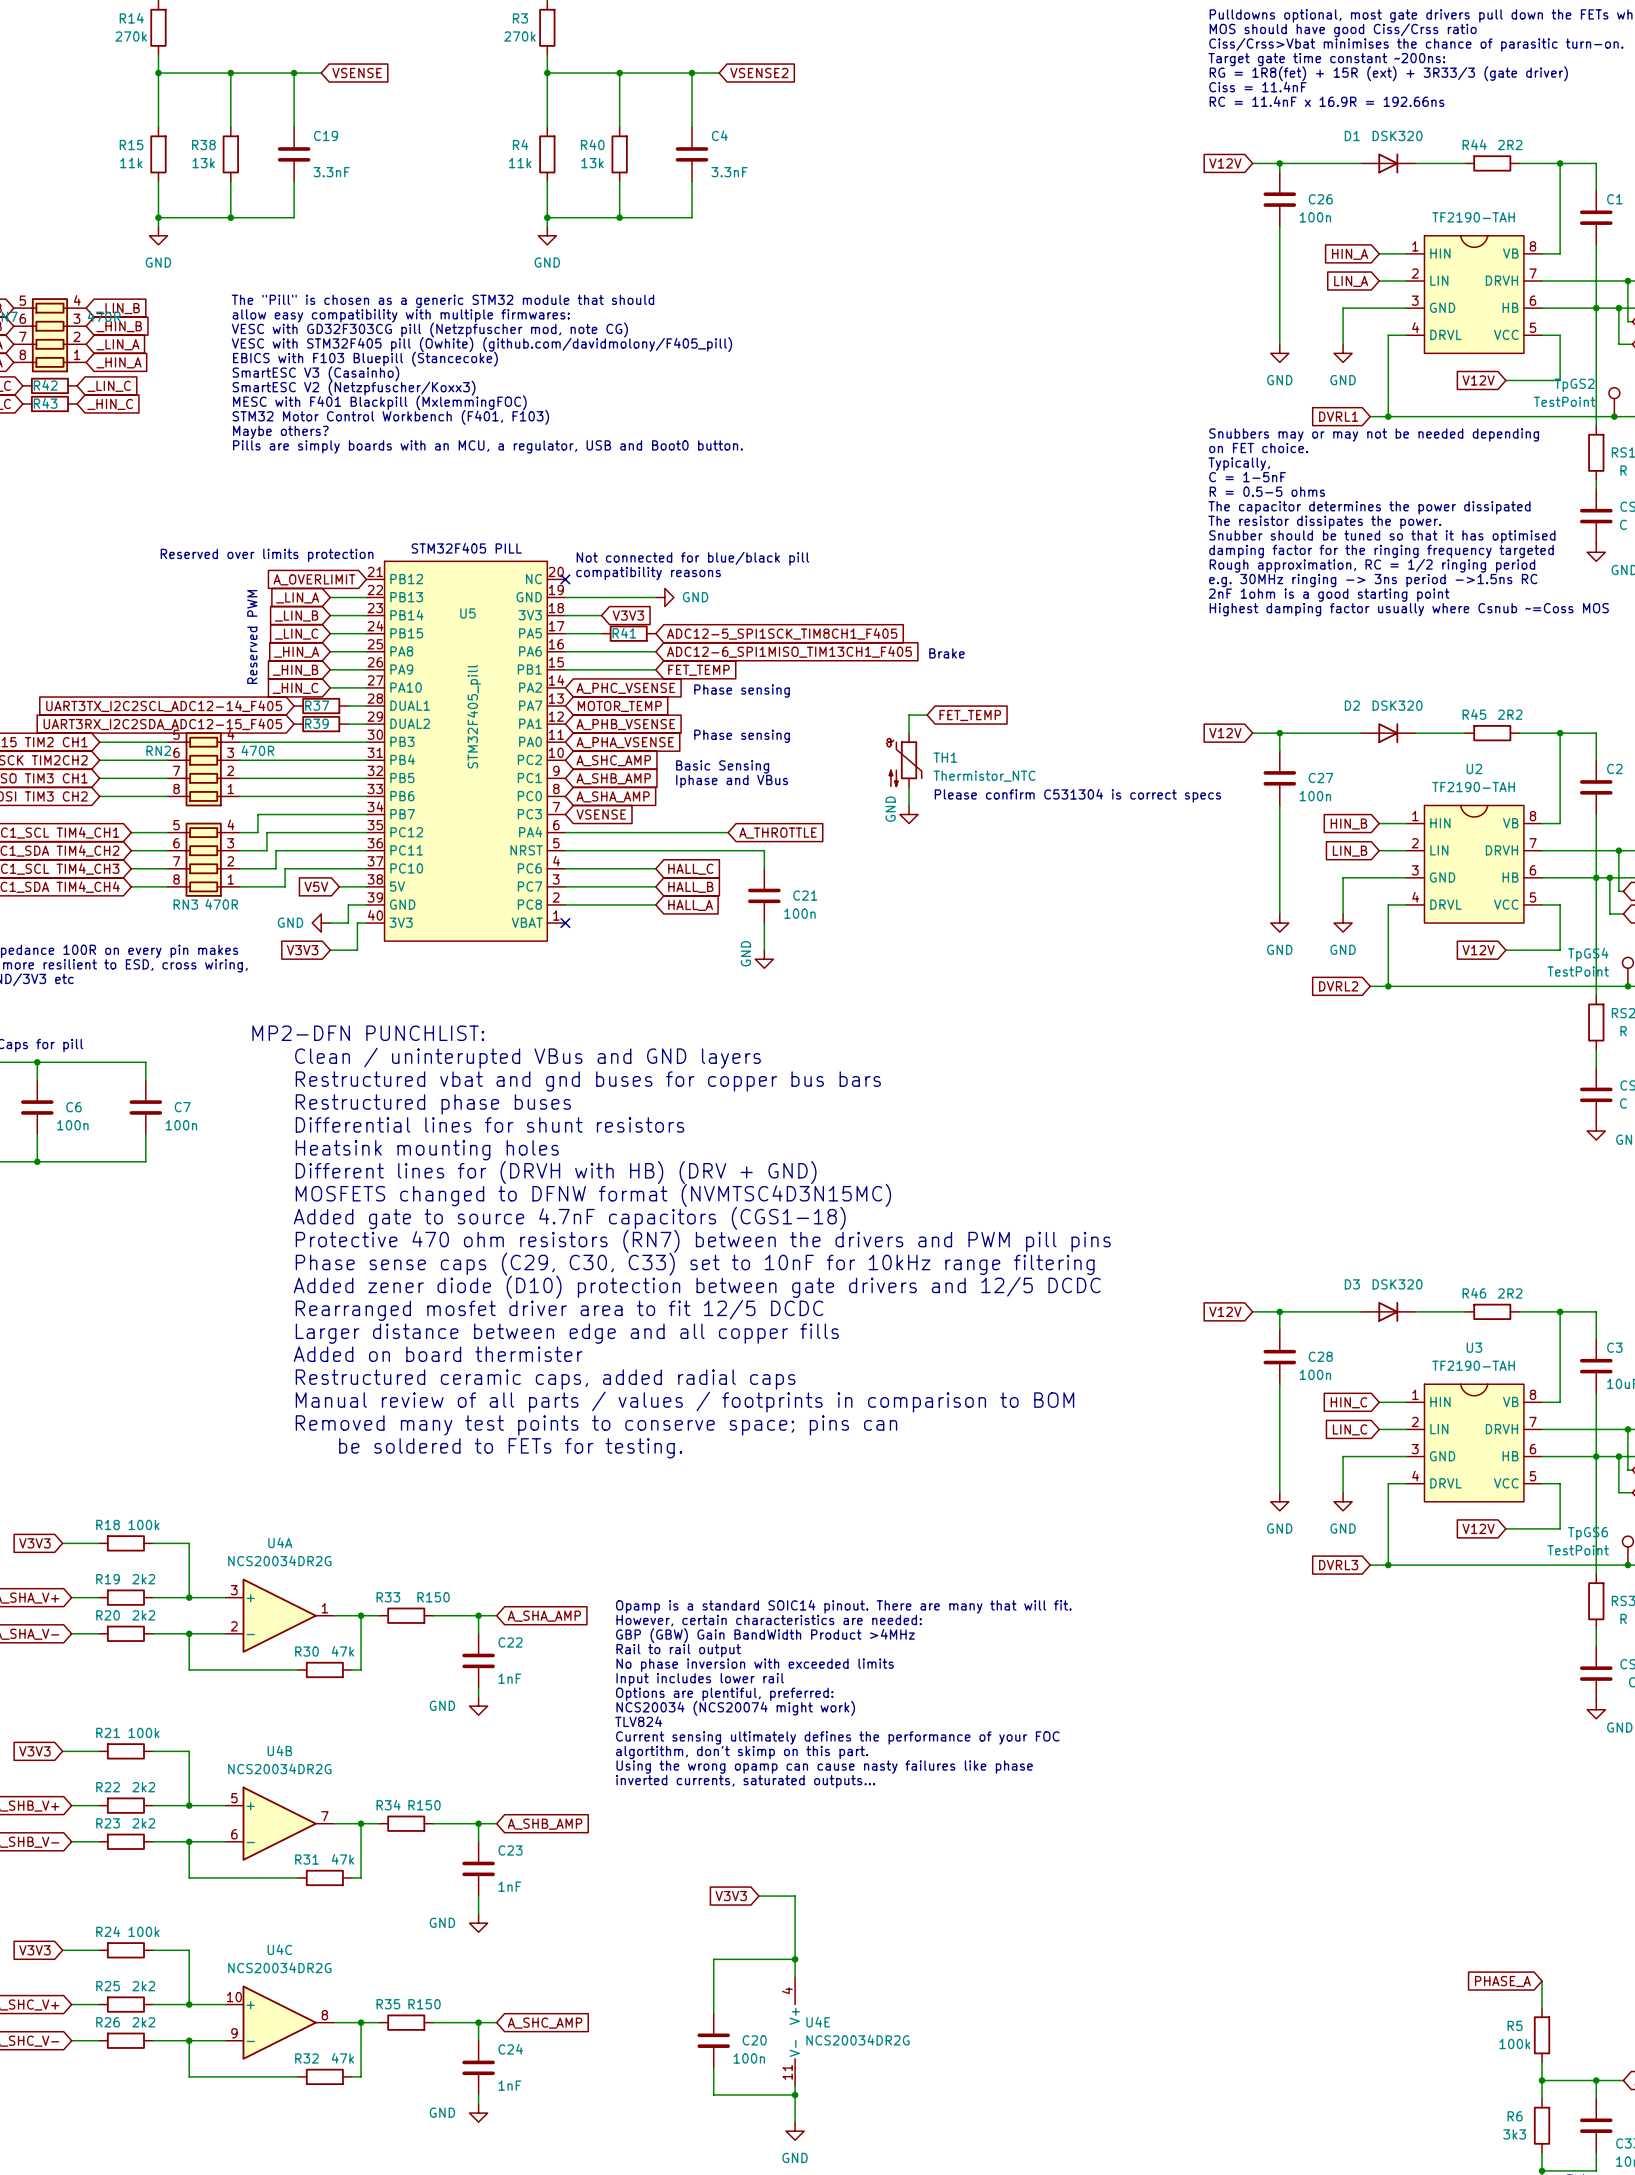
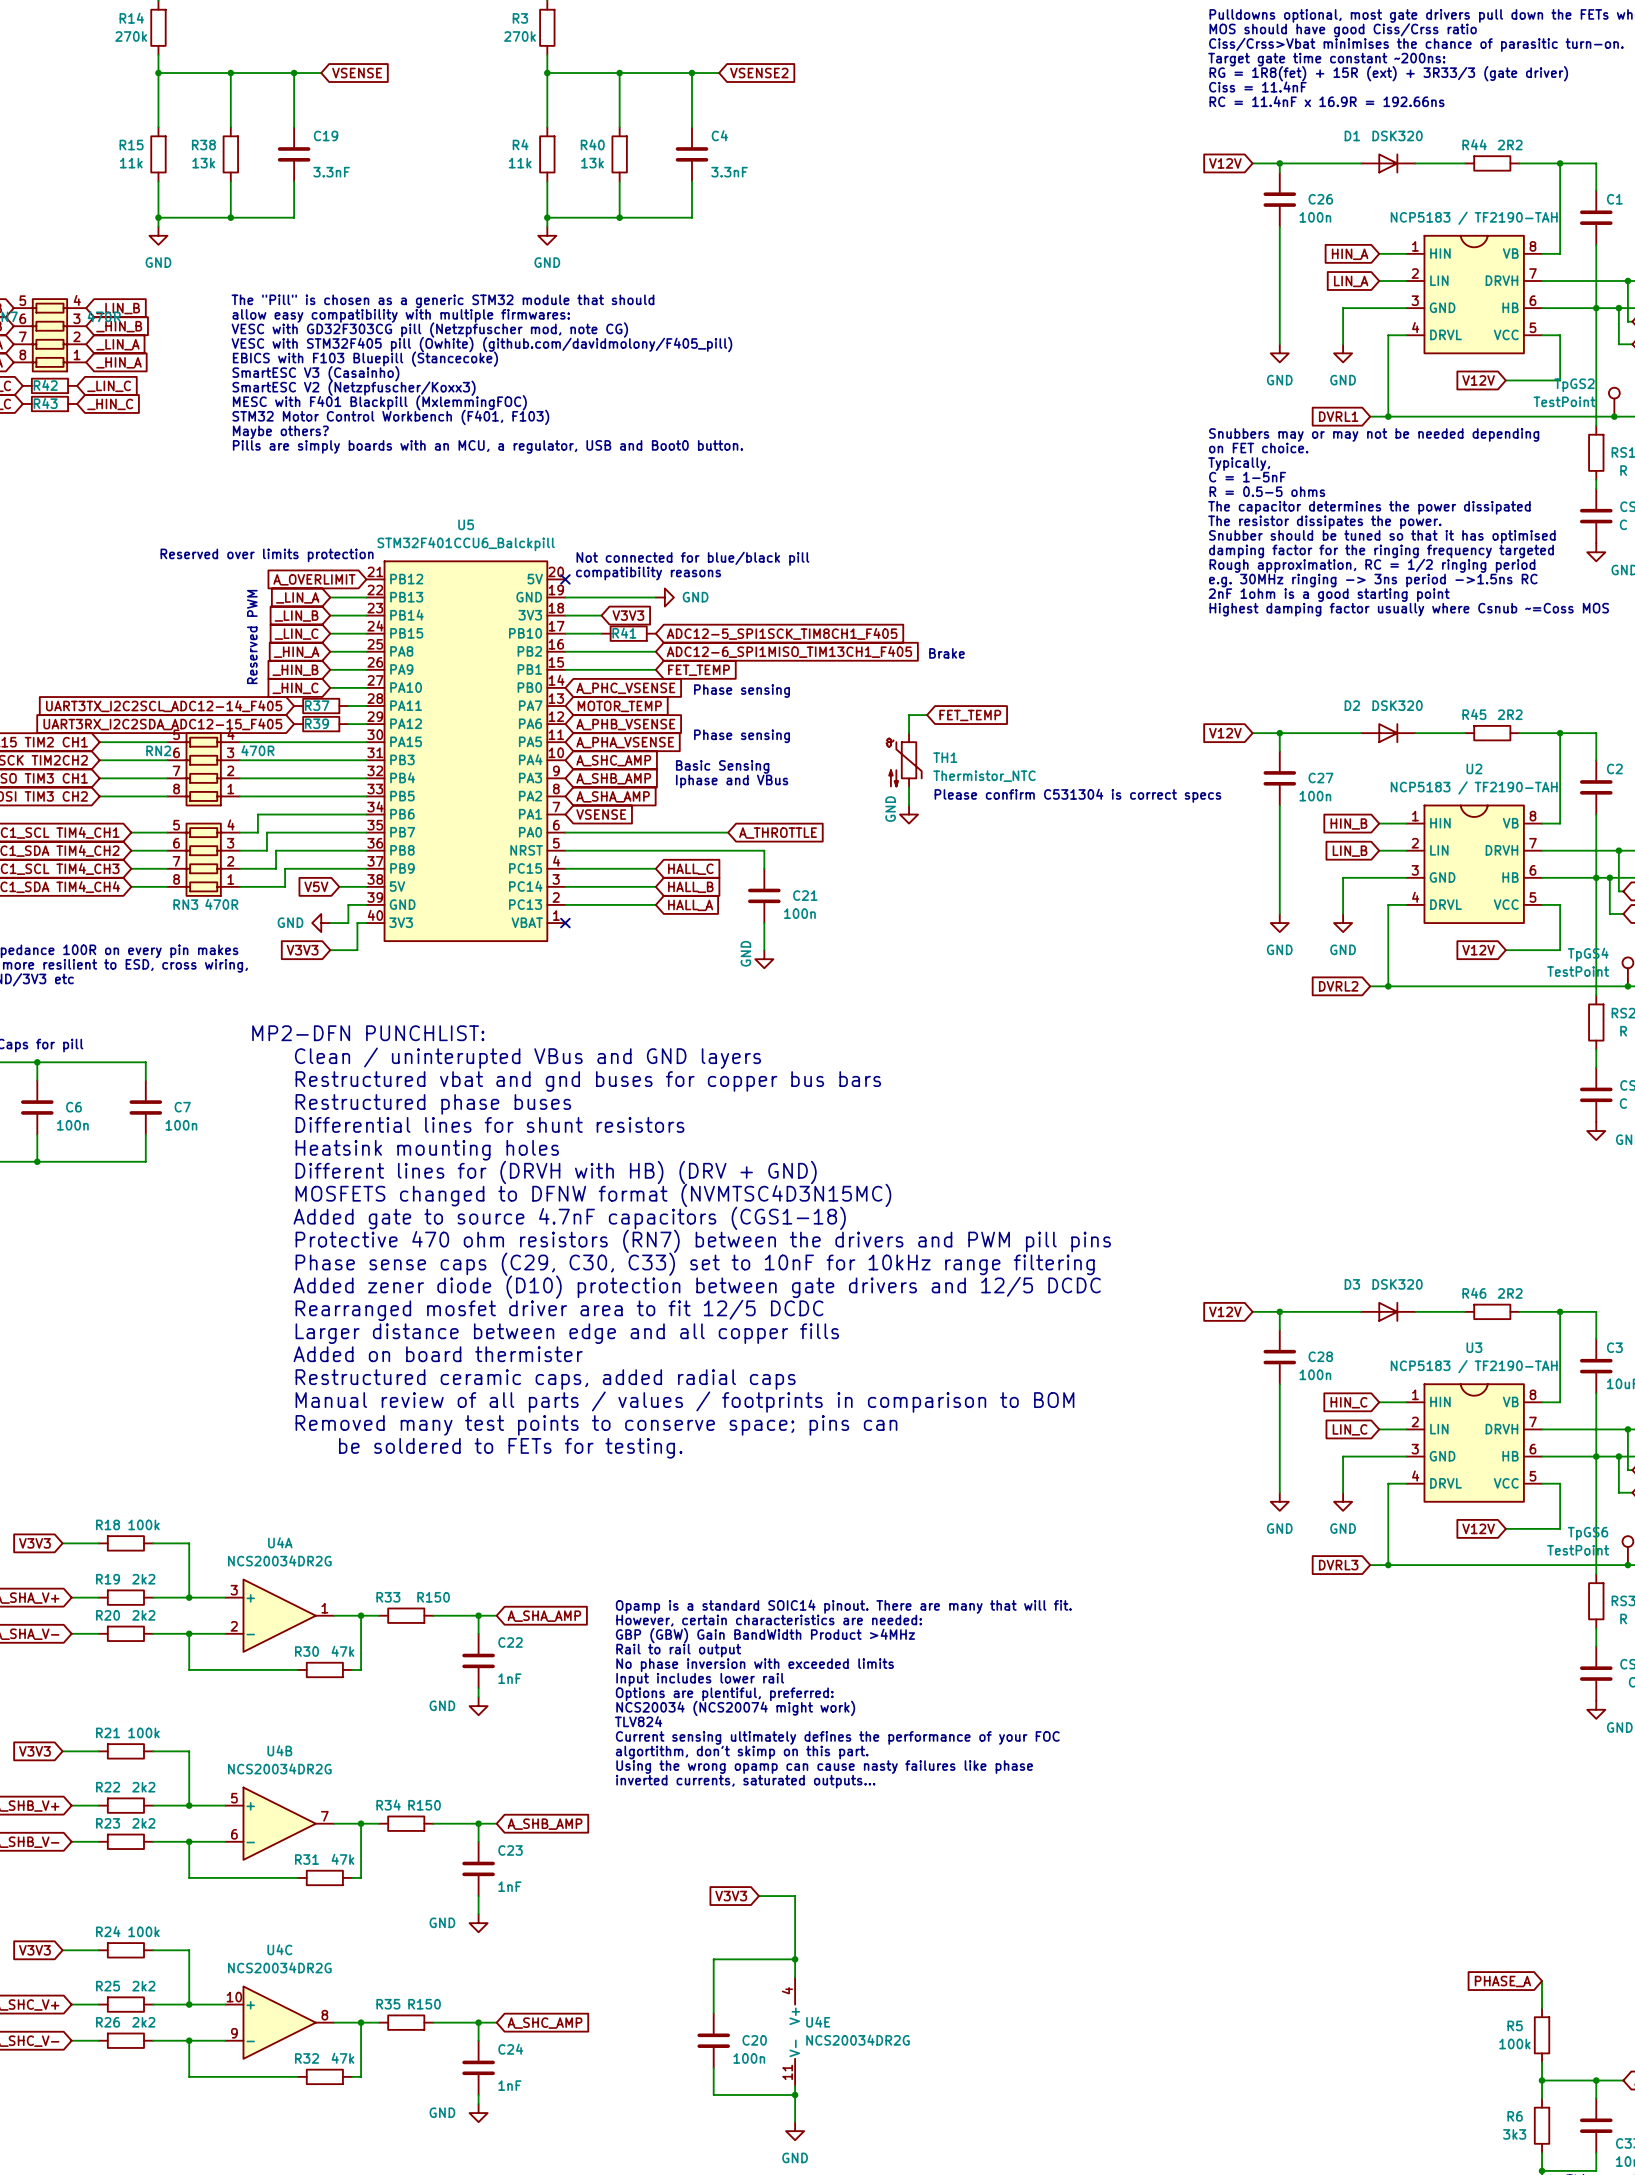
part value: TF2190-TAH (1473, 217) -> NCP5183 / TF2190-TAH (1474, 218)
text: STM32F405 PILL (466, 548) -> none
U5 symbol: [366, 561, 566, 942] -> [366, 561, 566, 942]
U5 name position: U5 (467, 613) -> U5 (466, 524)
U5 value: STM32F405_pill (474, 716) -> STM32F401CCU6_Balckpill (466, 544)
U2 value: TF2190-TAH (1473, 787) -> NCP5183 / TF2190-TAH (1474, 787)
U3 value: TF2190-TAH (1473, 1365) -> NCP5183 / TF2190-TAH (1474, 1366)

